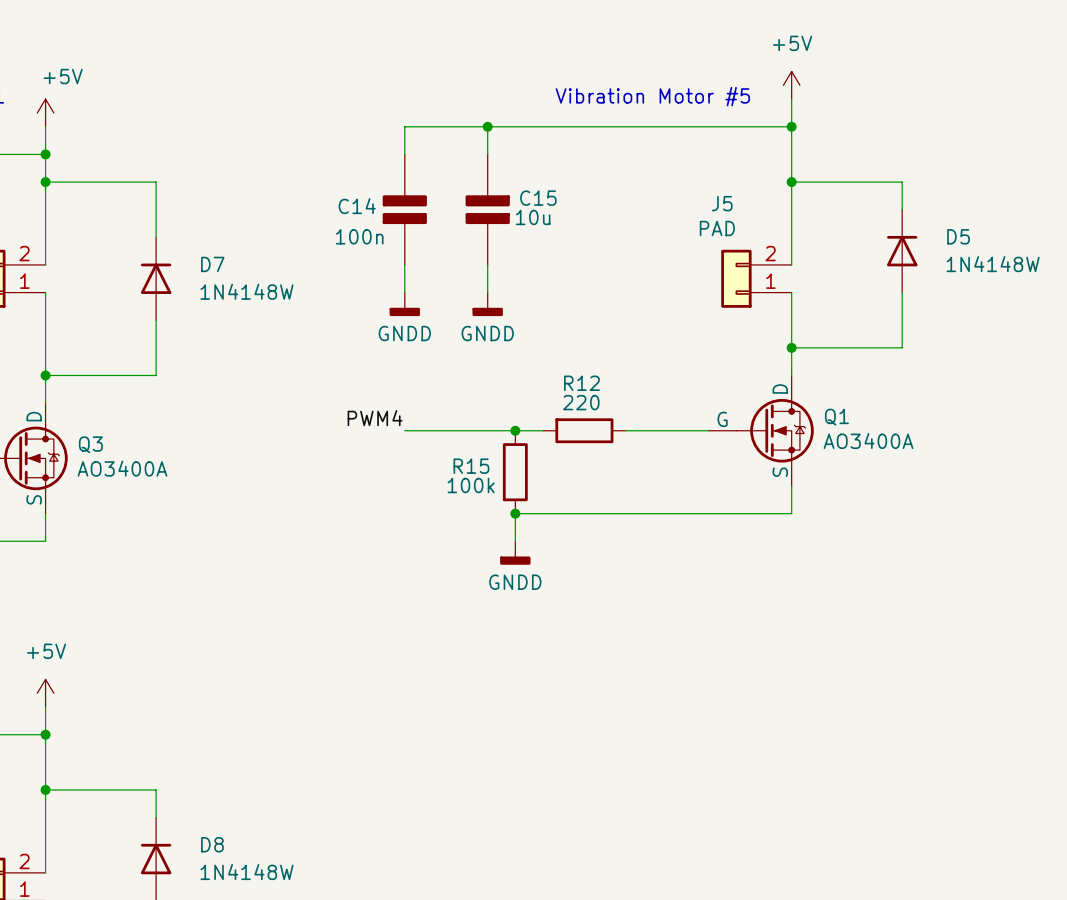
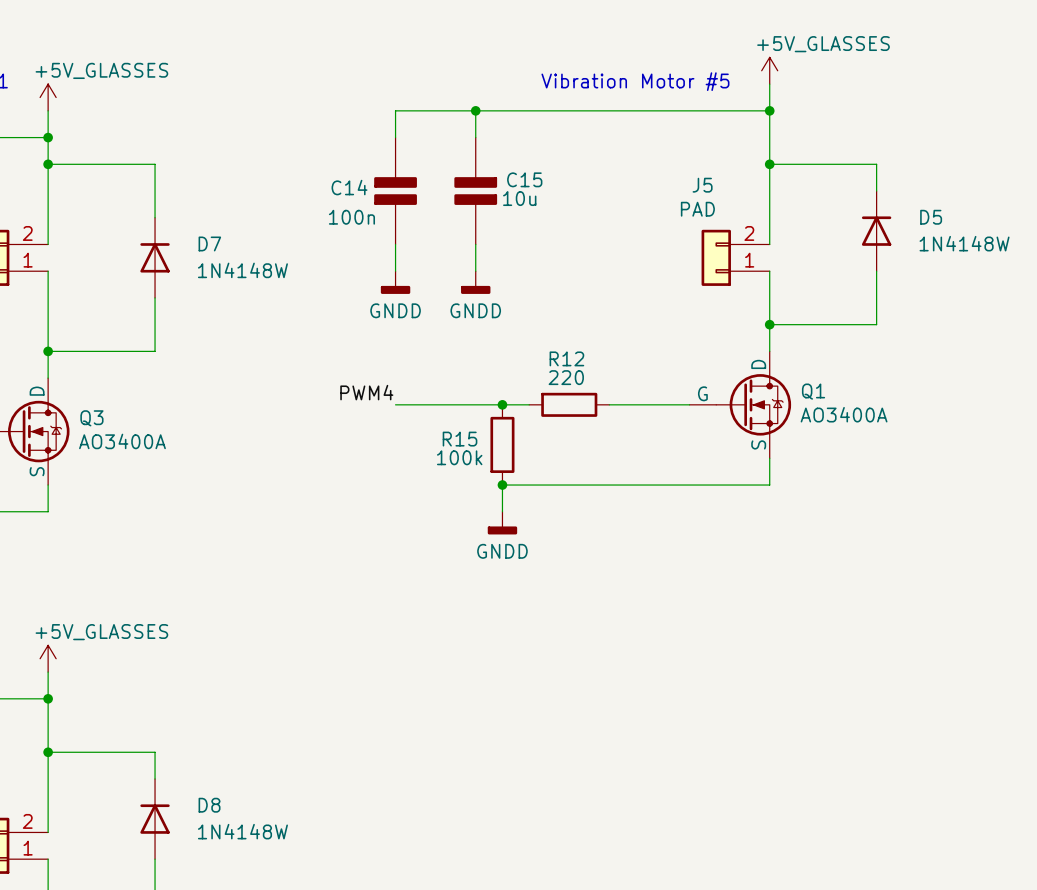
power symbol: +5V (791, 85) -> +5V_GLASSES (769, 70)
power symbol: +5V (45, 112) -> +5V_GLASSES (48, 97)
power symbol: +5V (45, 693) -> +5V_GLASSES (48, 658)

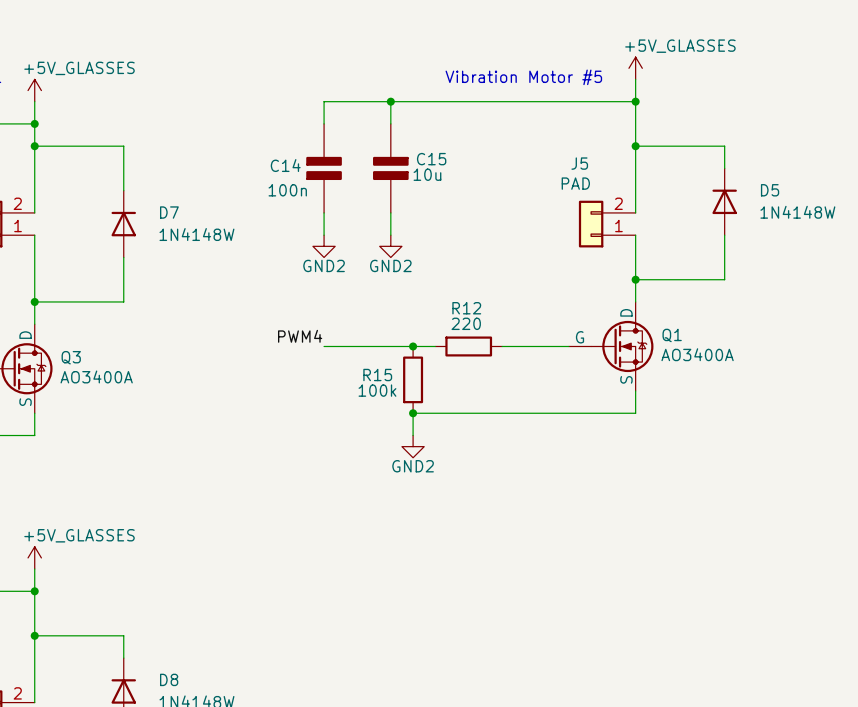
power symbol: GNDD (395, 282) -> GND2 (324, 246)
power symbol: GNDD (475, 282) -> GND2 (390, 246)
power symbol: GNDD (502, 523) -> GND2 (413, 446)

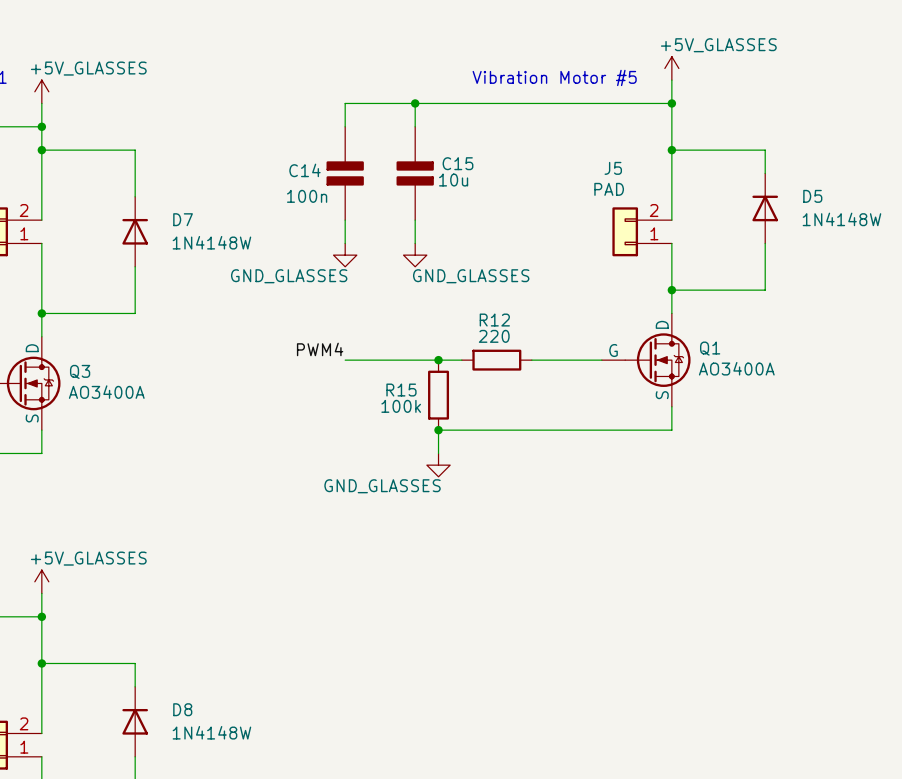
power symbol: GND2 (324, 246) -> GND_GLASSES (345, 255)
power symbol: GND2 (390, 246) -> GND_GLASSES (415, 255)
power symbol: GND2 (413, 446) -> GND_GLASSES (438, 465)

